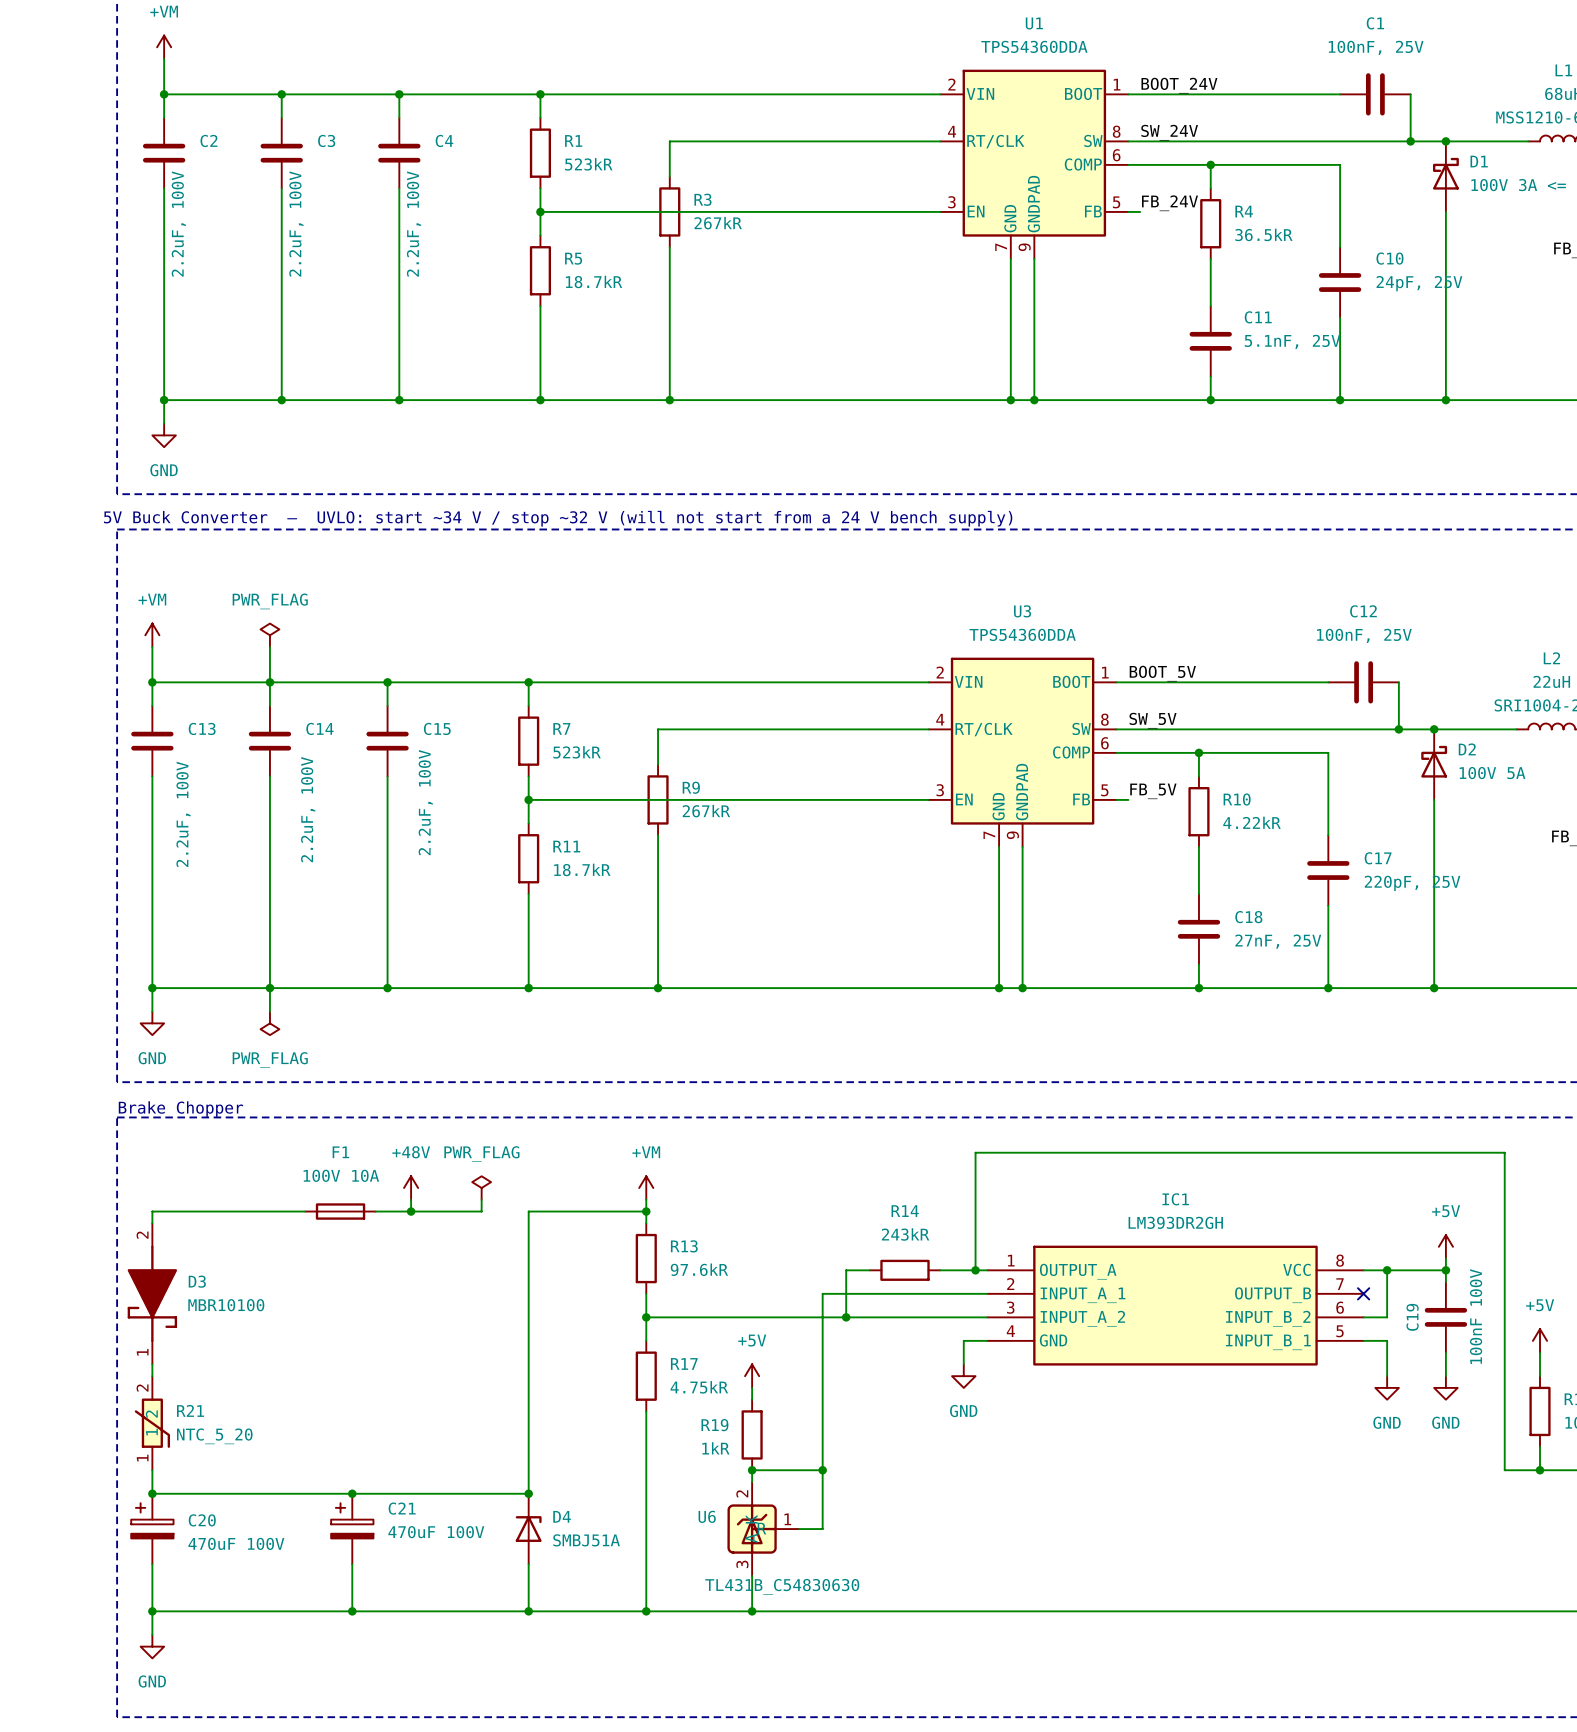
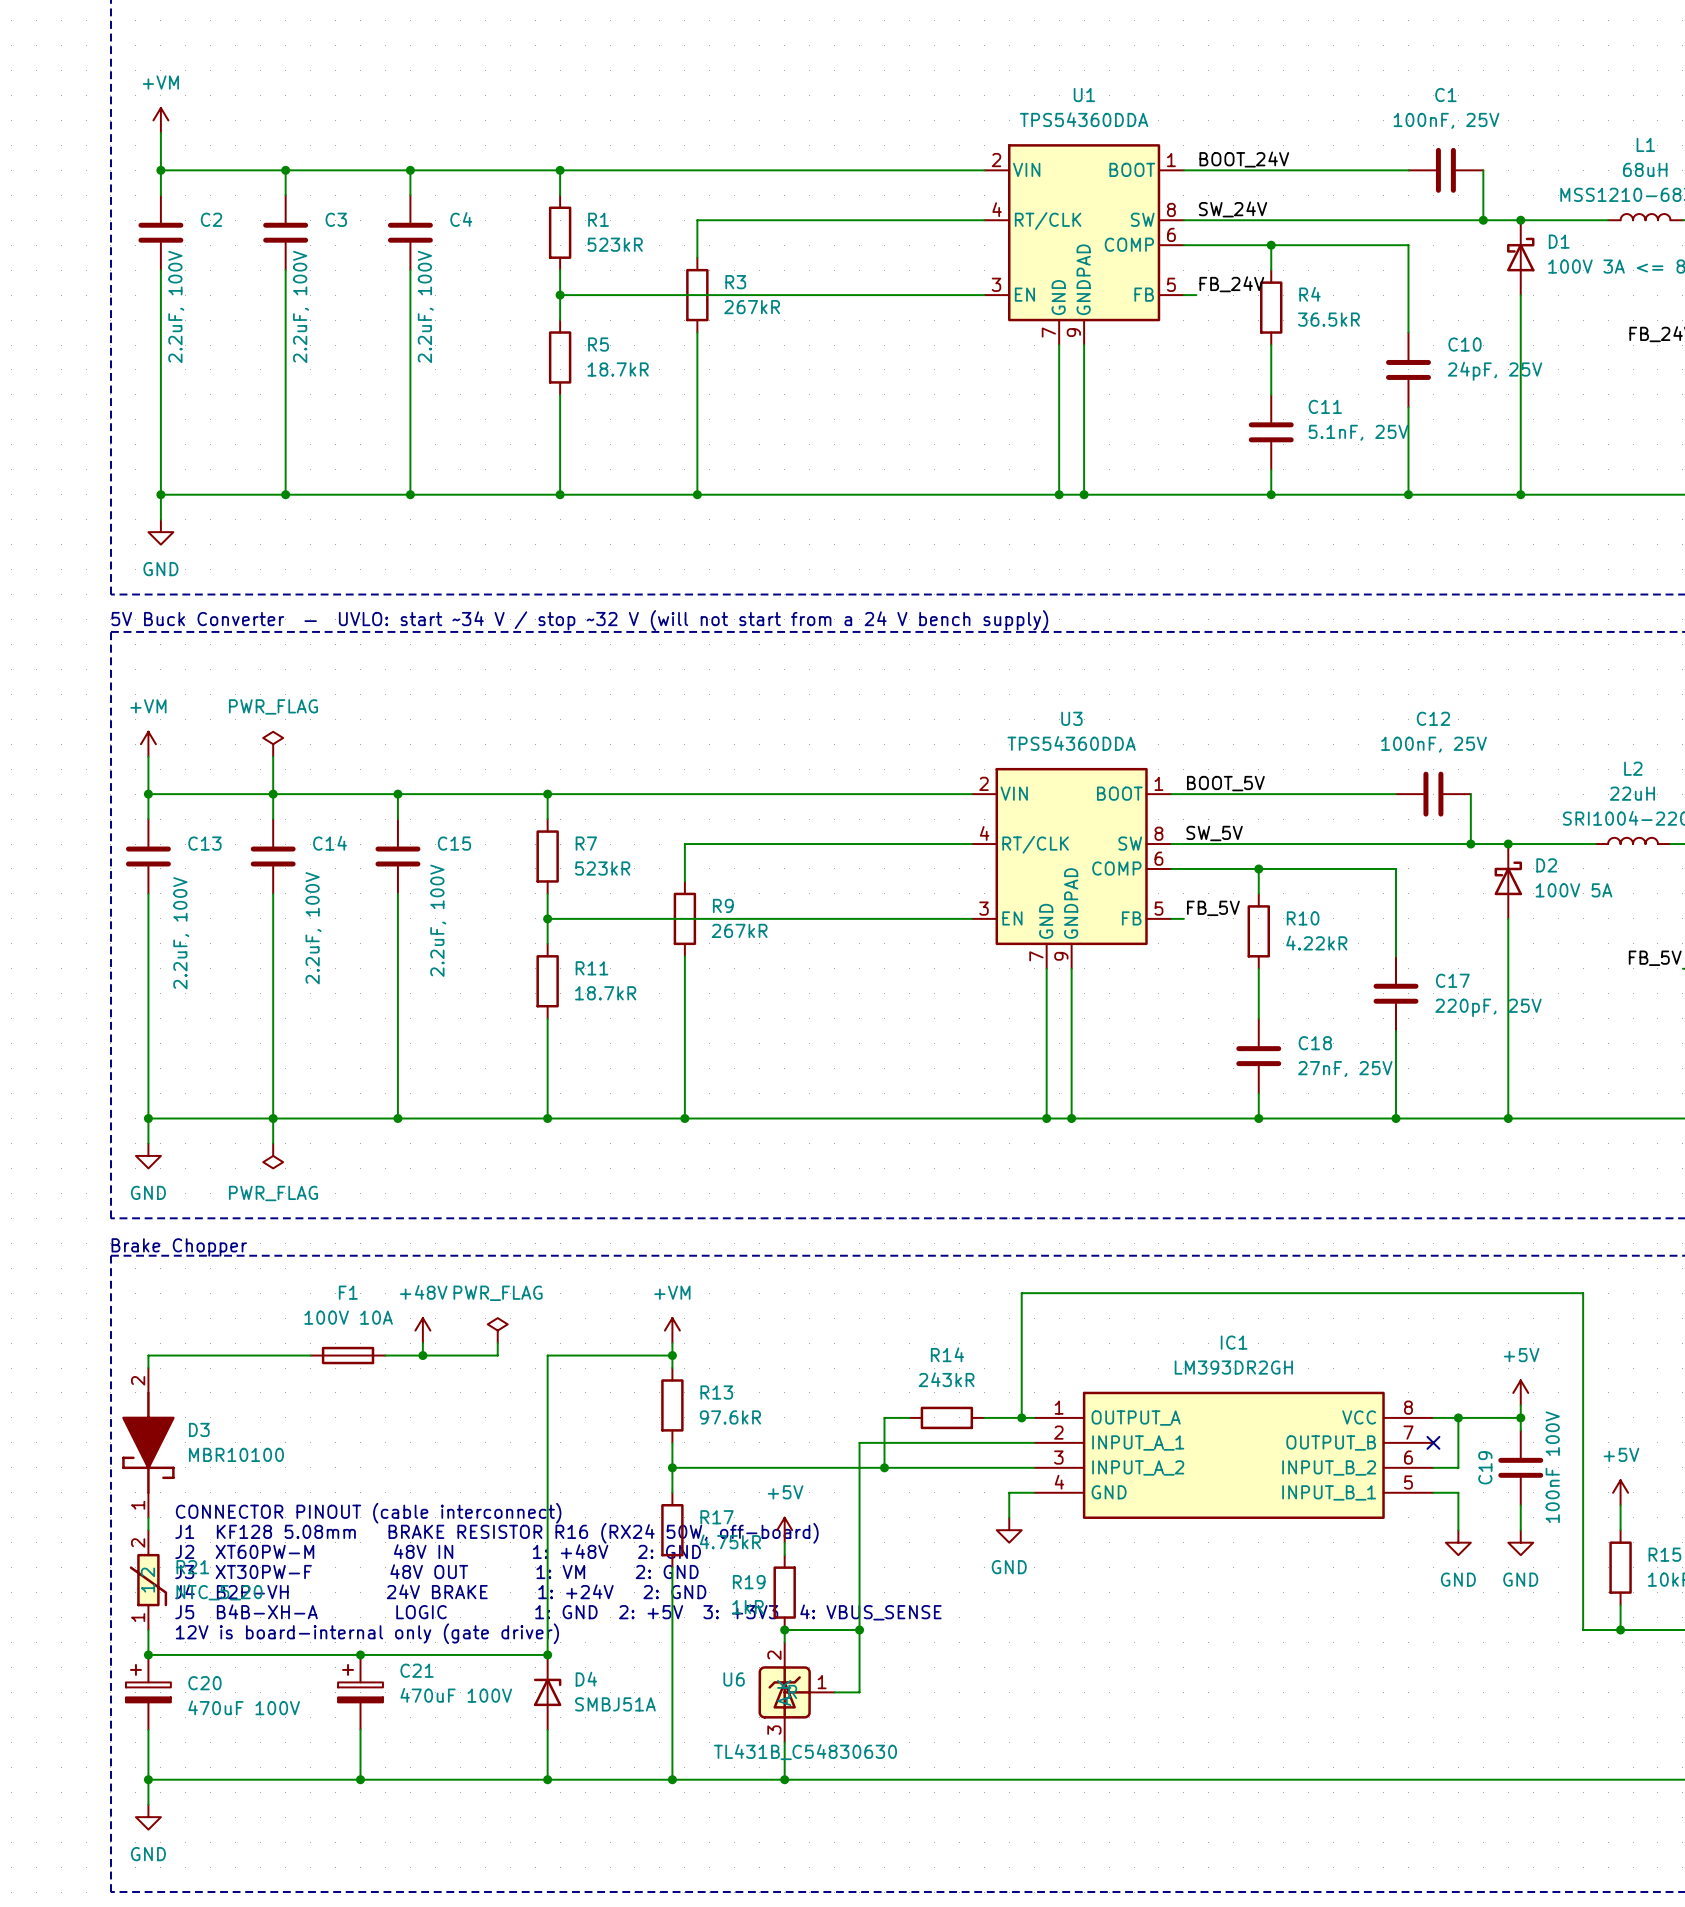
text: none -> CONNECTOR PINOUT (cable interconnect) (368, 1513)
text: none -> J1 KF128 5.08mm BRAKE RESISTOR R16 (RX24 50W, off-board) (496, 1533)
text: none -> J2 XT60PW-M 48V IN 1: +48V 2: GND (438, 1551)
text: none -> J3 XT30PW-F 48V OUT 1: VM 2: GND (436, 1571)
text: none -> J4 B2P-VH 24V BRAKE 1: +24V 2: GND (440, 1591)
text: none -> J5 B4B-XH-A LOGIC 1: GND 2: +5V 3: +3V3 4: VBUS_SENSE (558, 1612)
text: none -> 12V is board-internal only (gate driver) (367, 1633)

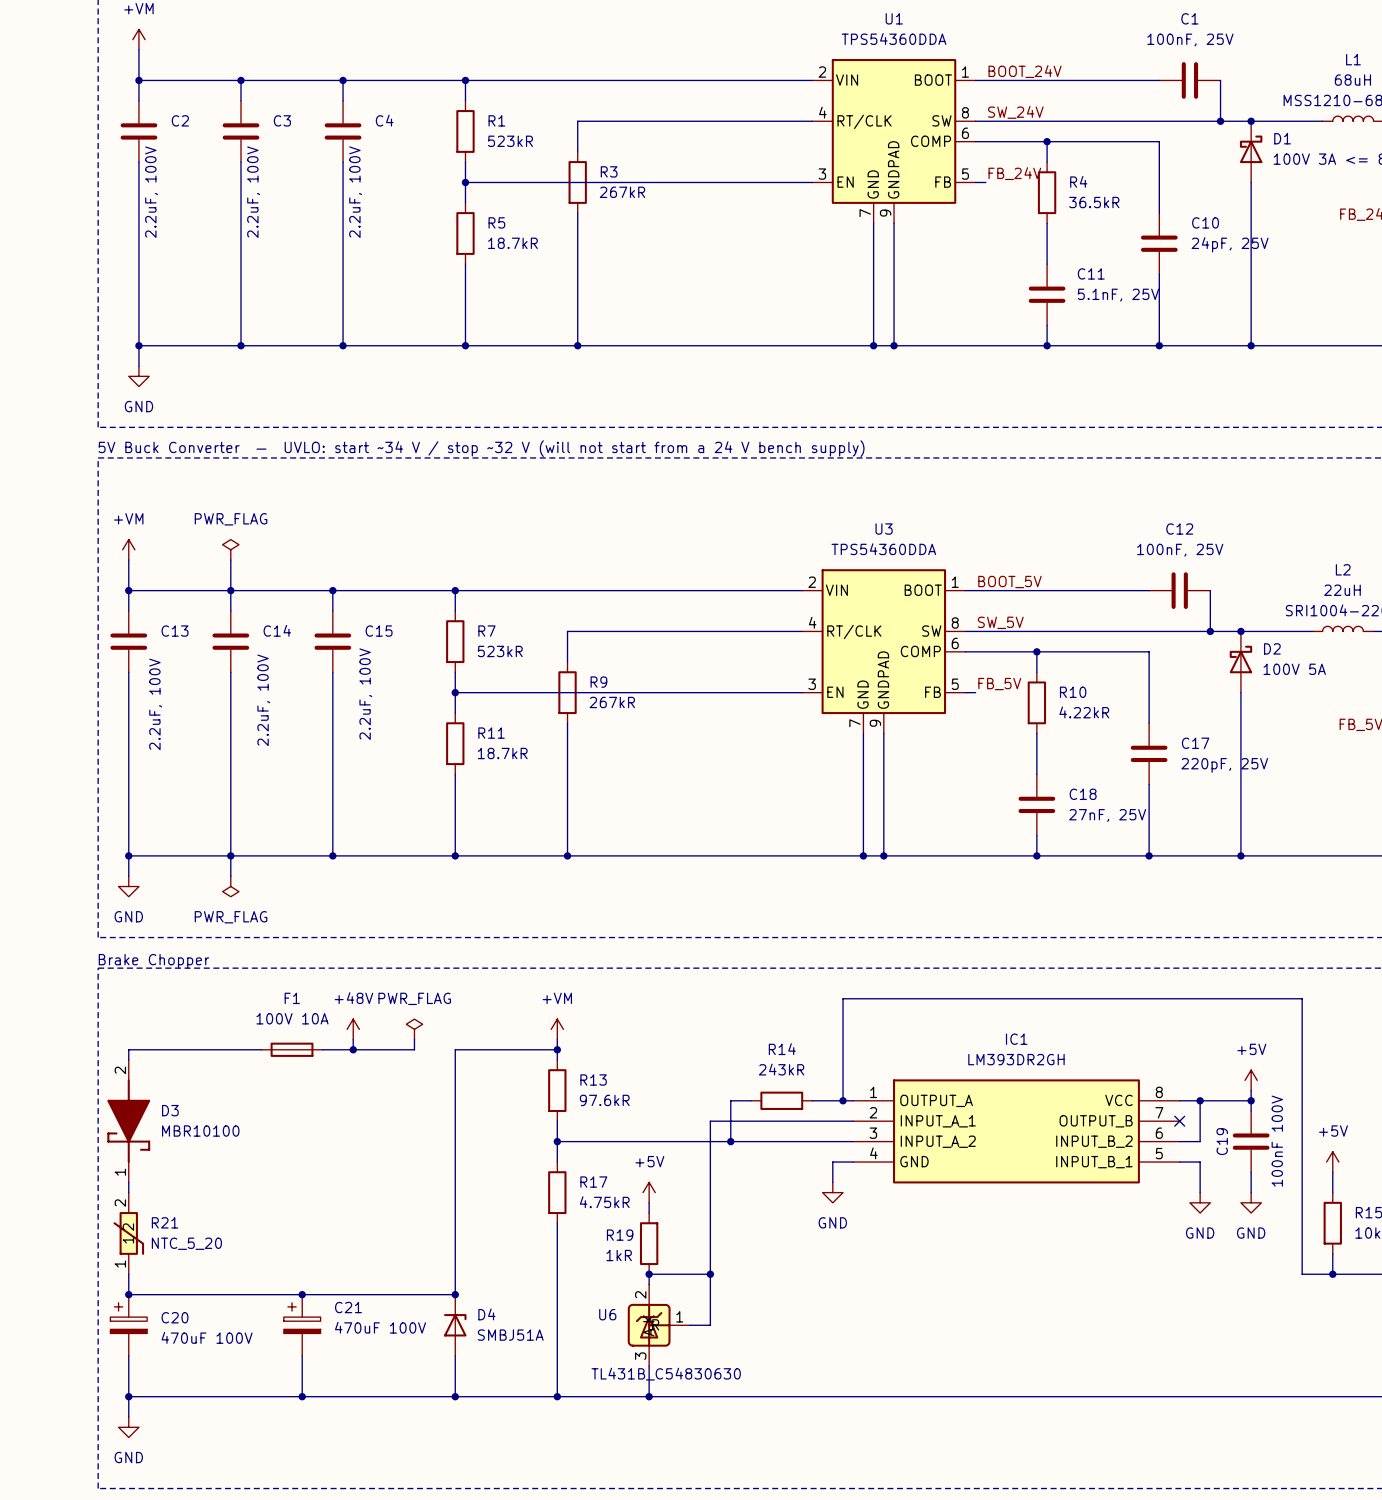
text: CONNECTOR PINOUT (cable interconnect) (368, 1513) -> none
text: J1 KF128 5.08mm BRAKE RESISTOR R16 (RX24 50W, off-board) (496, 1533) -> none
text: J2 XT60PW-M 48V IN 1: +48V 2: GND (438, 1551) -> none
text: J3 XT30PW-F 48V OUT 1: VM 2: GND (436, 1571) -> none
text: J4 B2P-VH 24V BRAKE 1: +24V 2: GND (440, 1591) -> none
text: J5 B4B-XH-A LOGIC 1: GND 2: +5V 3: +3V3 4: VBUS_SENSE (558, 1612) -> none
text: 12V is board-internal only (gate driver) (367, 1633) -> none

